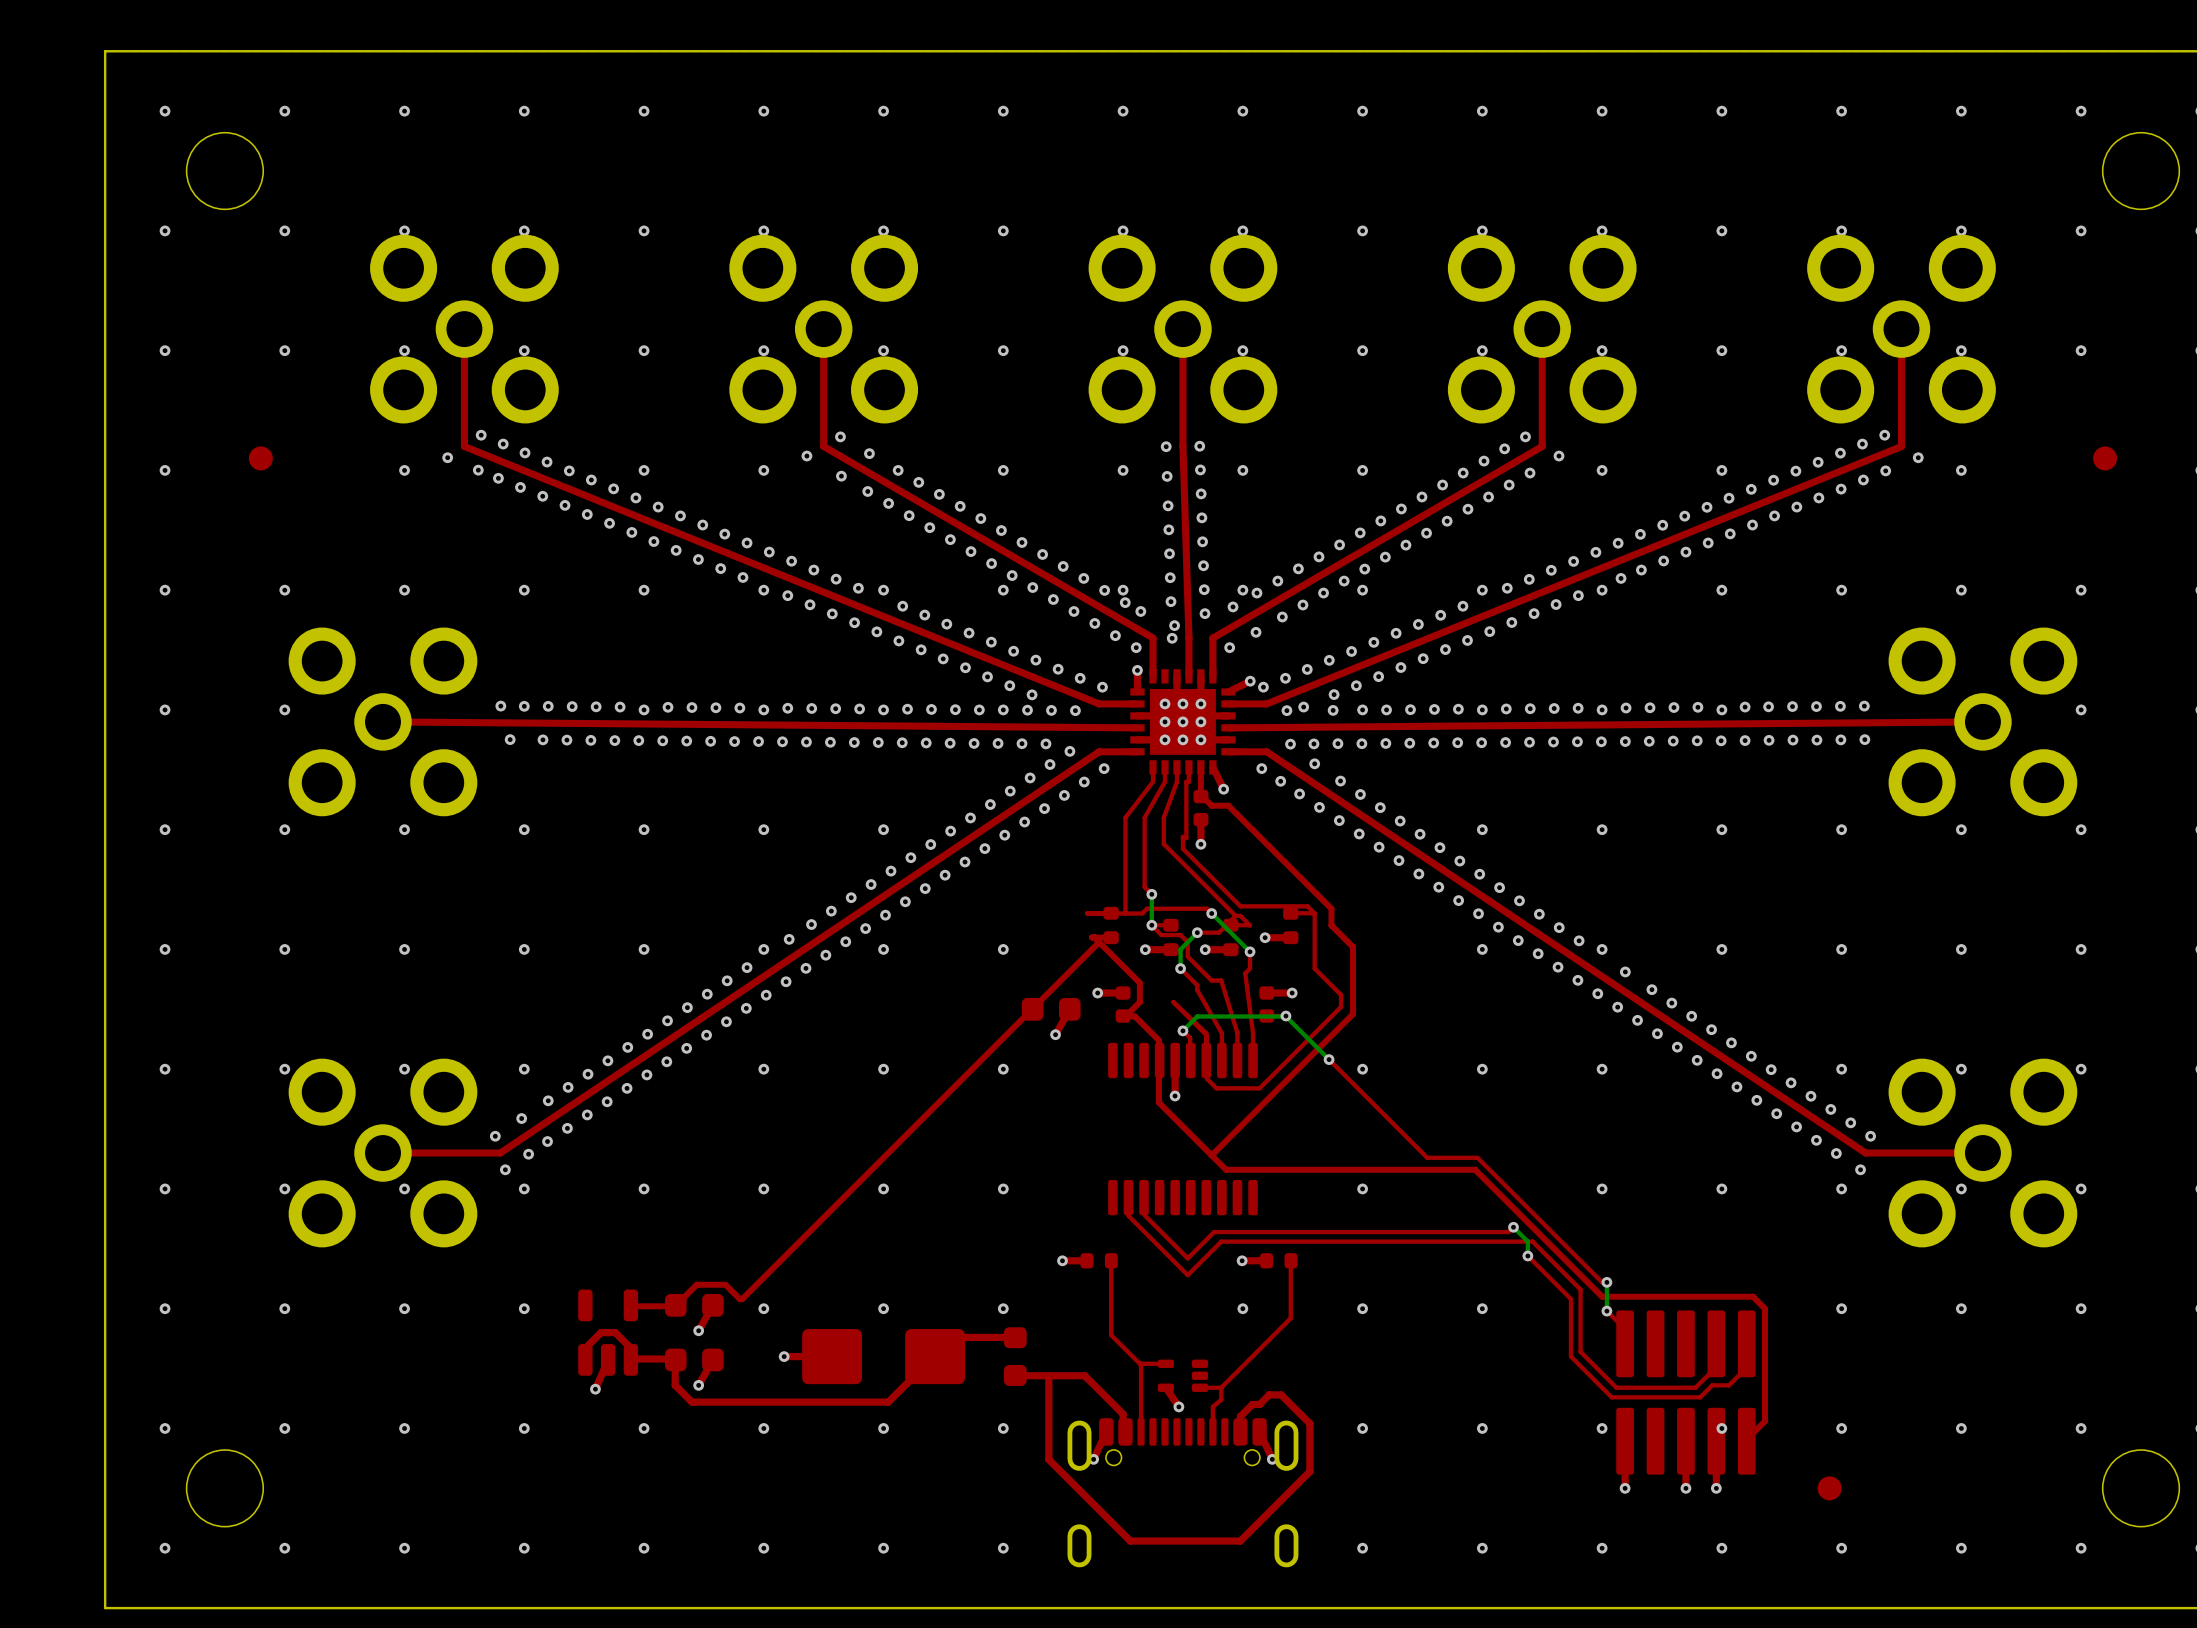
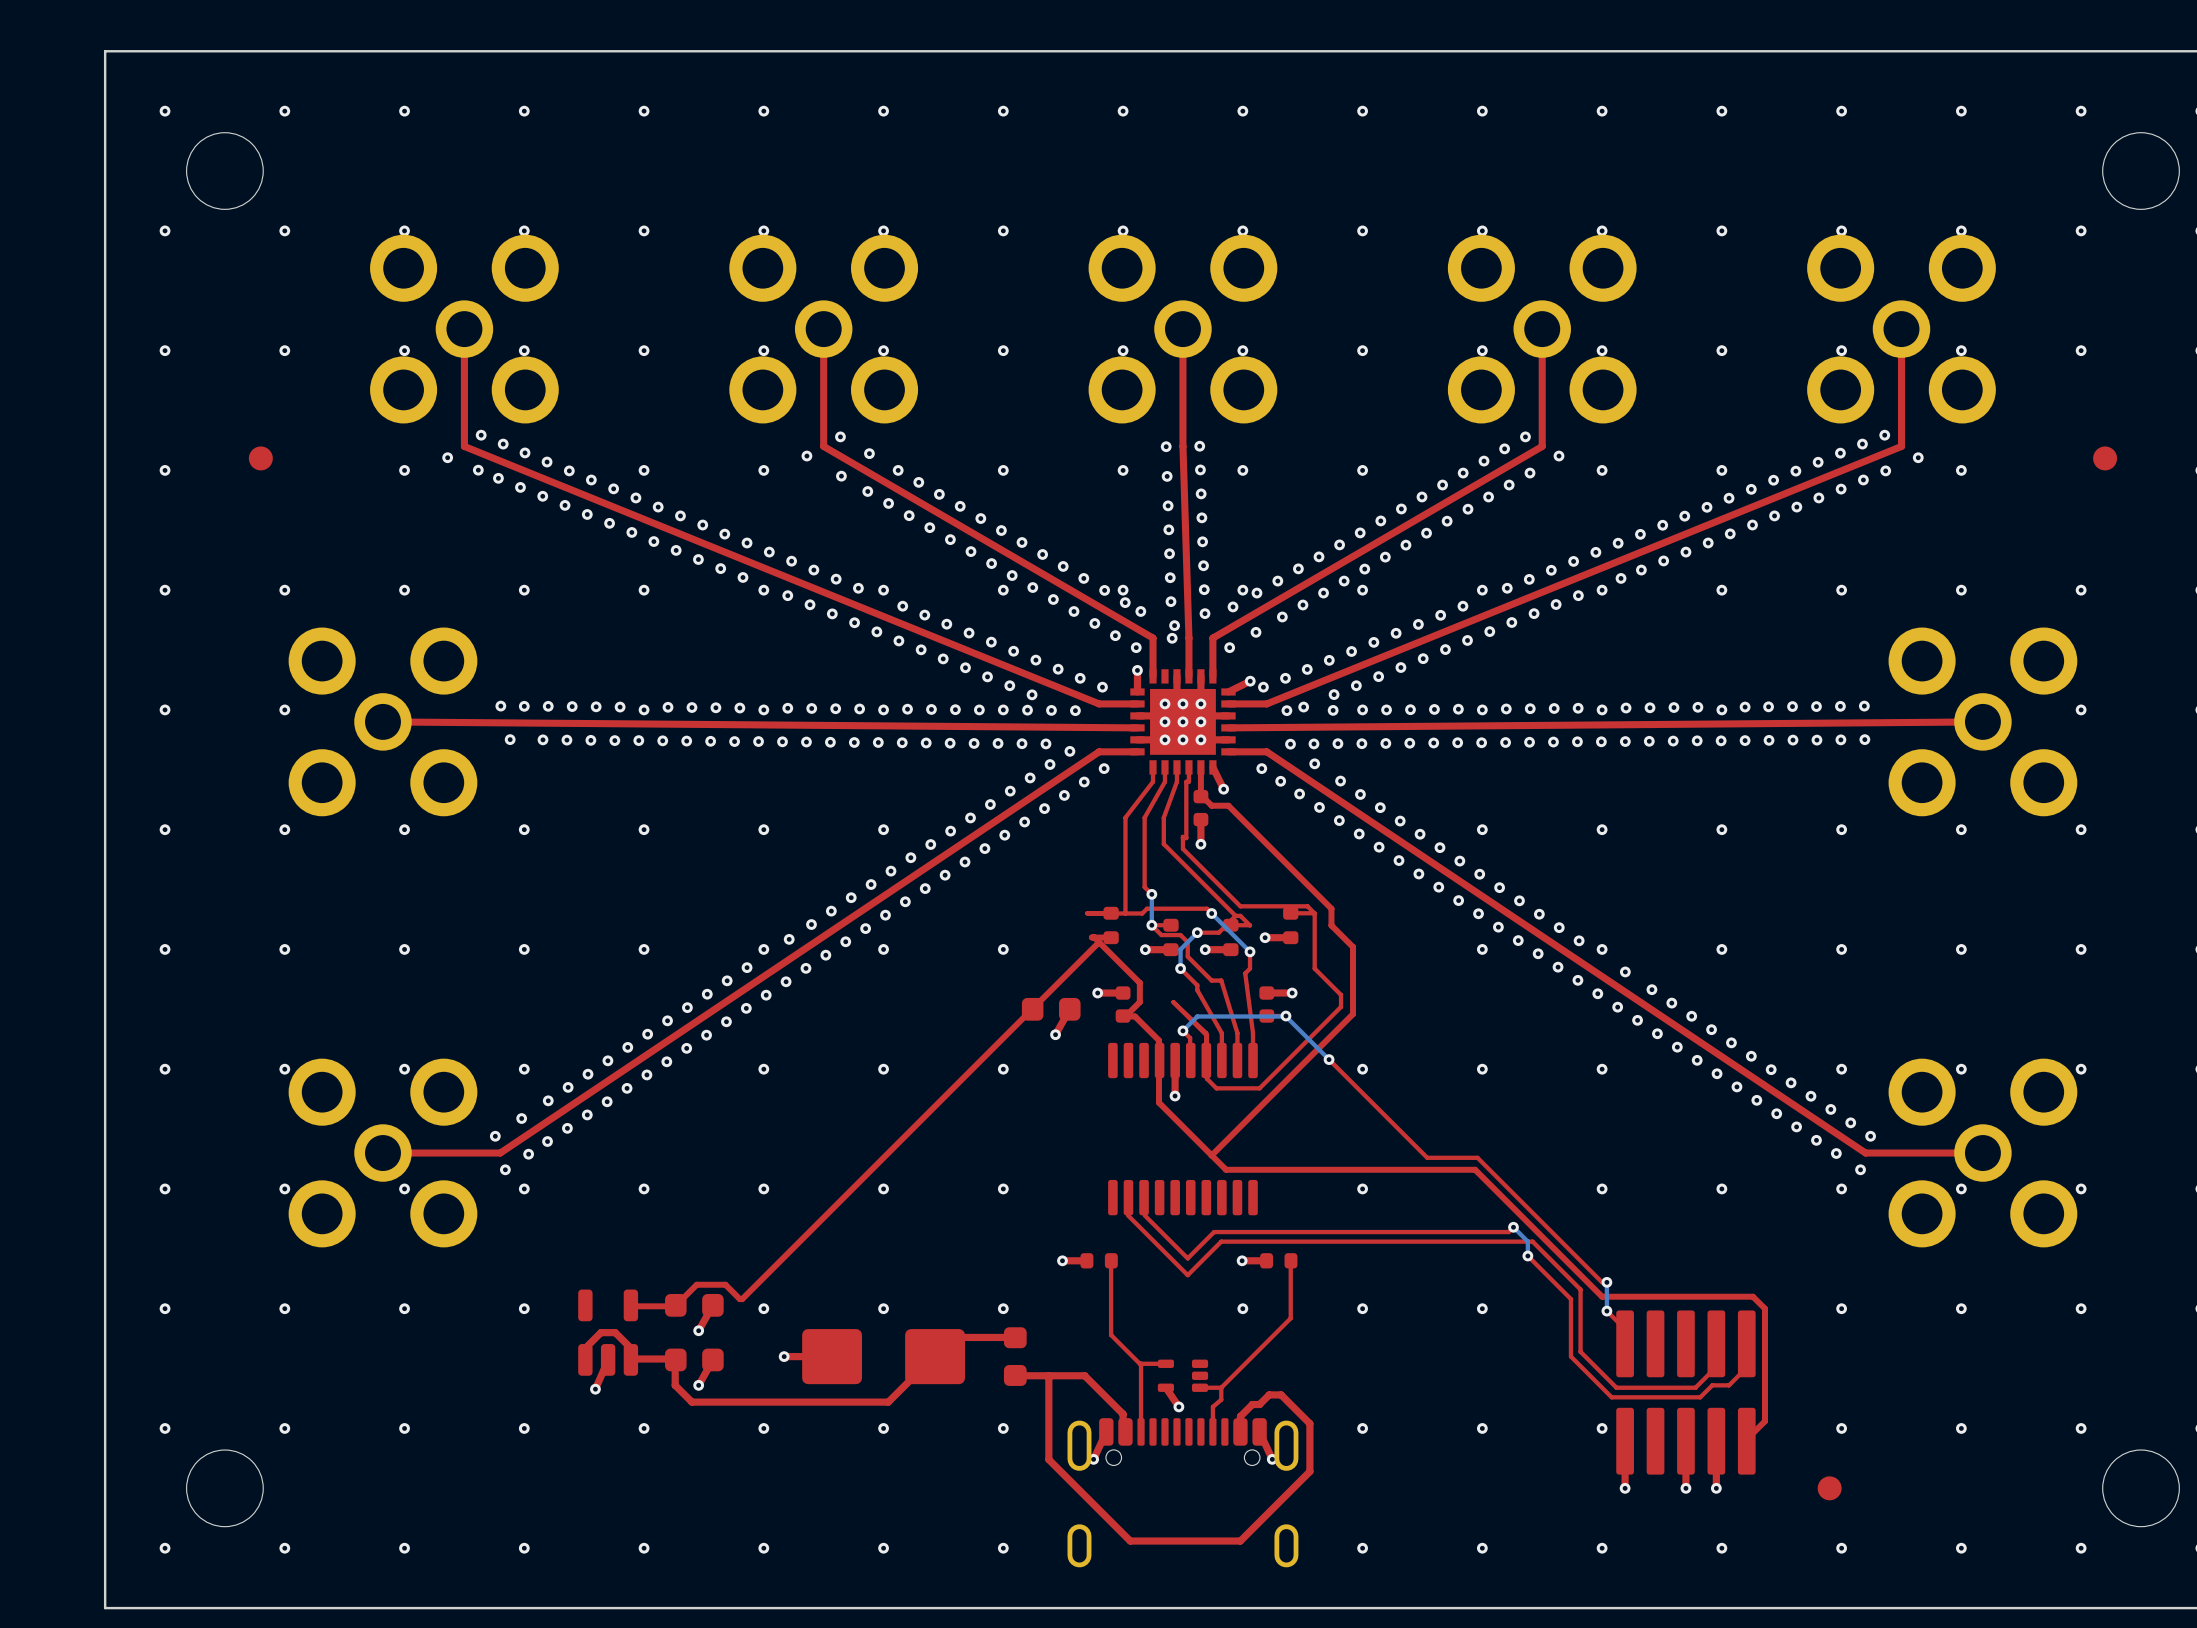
via: (1721, 1428) -> none

